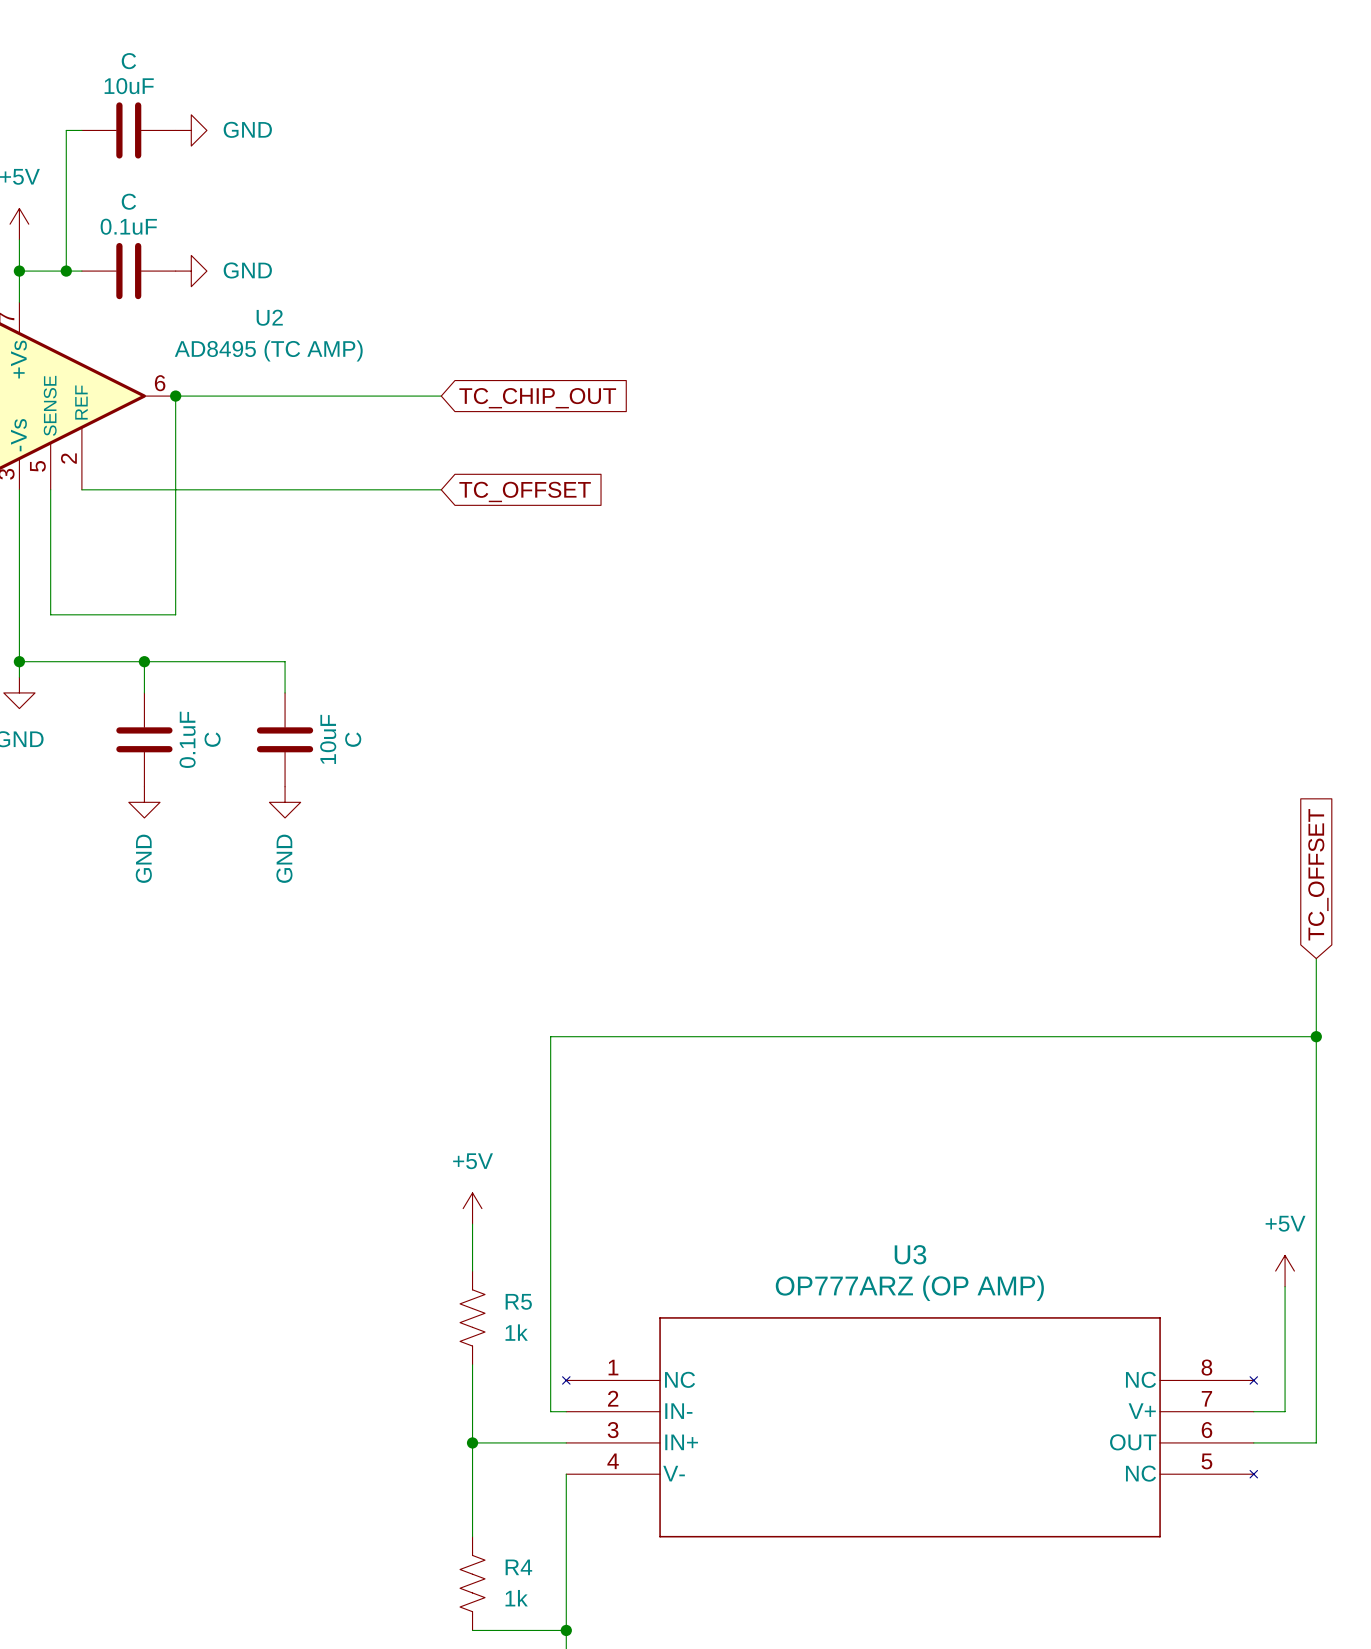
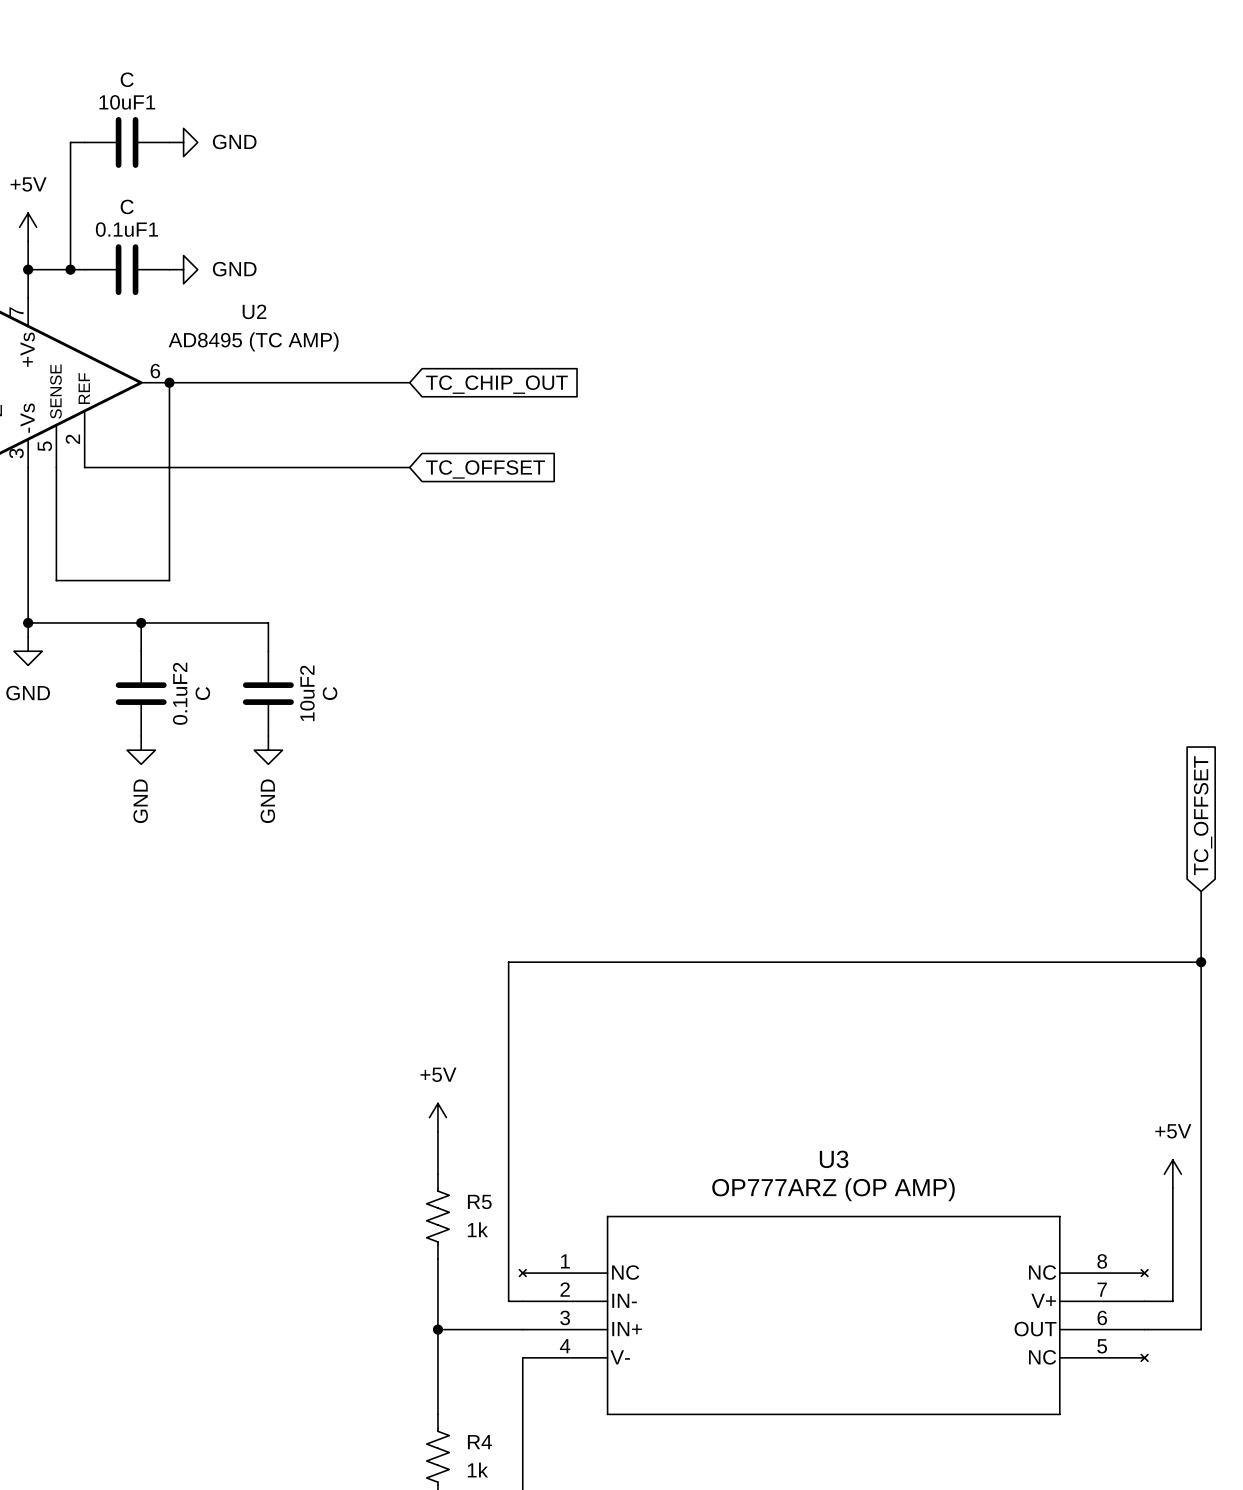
10uF name: 10uF (129, 86) -> 10uF1 (127, 102)
0.1uF name: 0.1uF (128, 226) -> 0.1uF1 (126, 229)
0.1uF name: 0.1uF (187, 739) -> 0.1uF2 (180, 693)
10uF name: 10uF (328, 739) -> 10uF2 (307, 693)

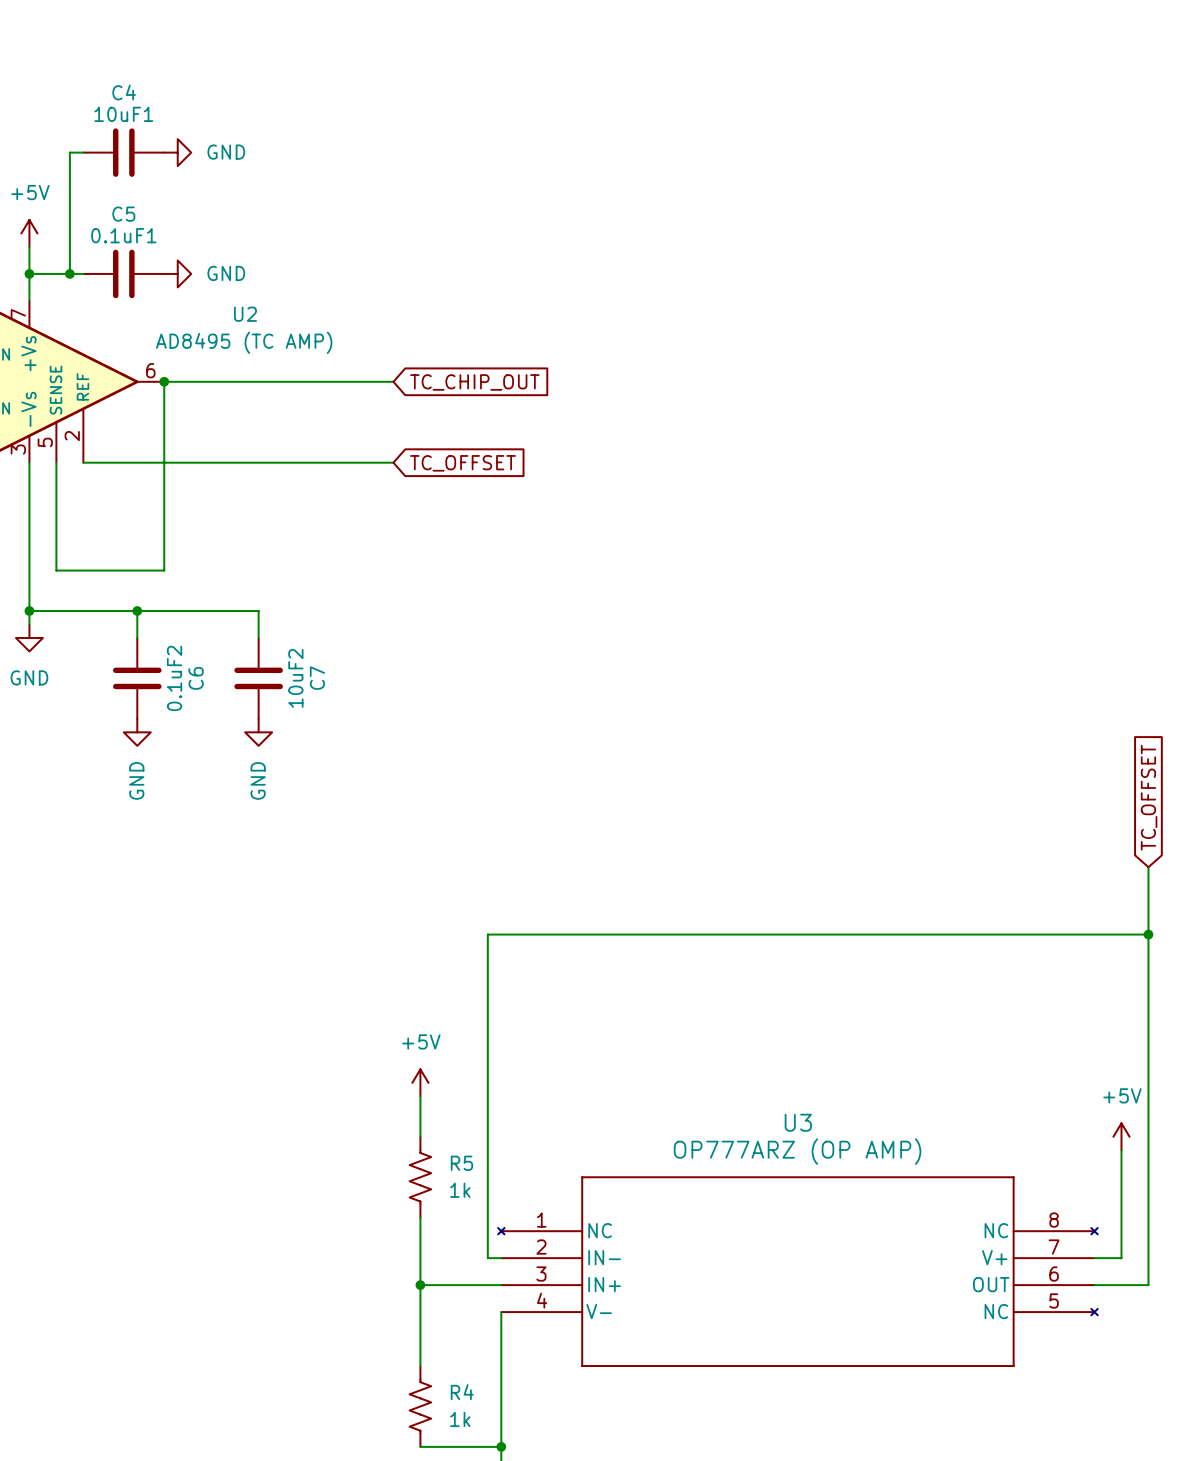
10uF1 value: C (127, 79) -> C4 (124, 92)
0.1uF1 value: C (127, 206) -> C5 (123, 214)
0.1uF2 value: C (202, 693) -> C6 (196, 678)
10uF2 value: C (330, 693) -> C7 (317, 678)

